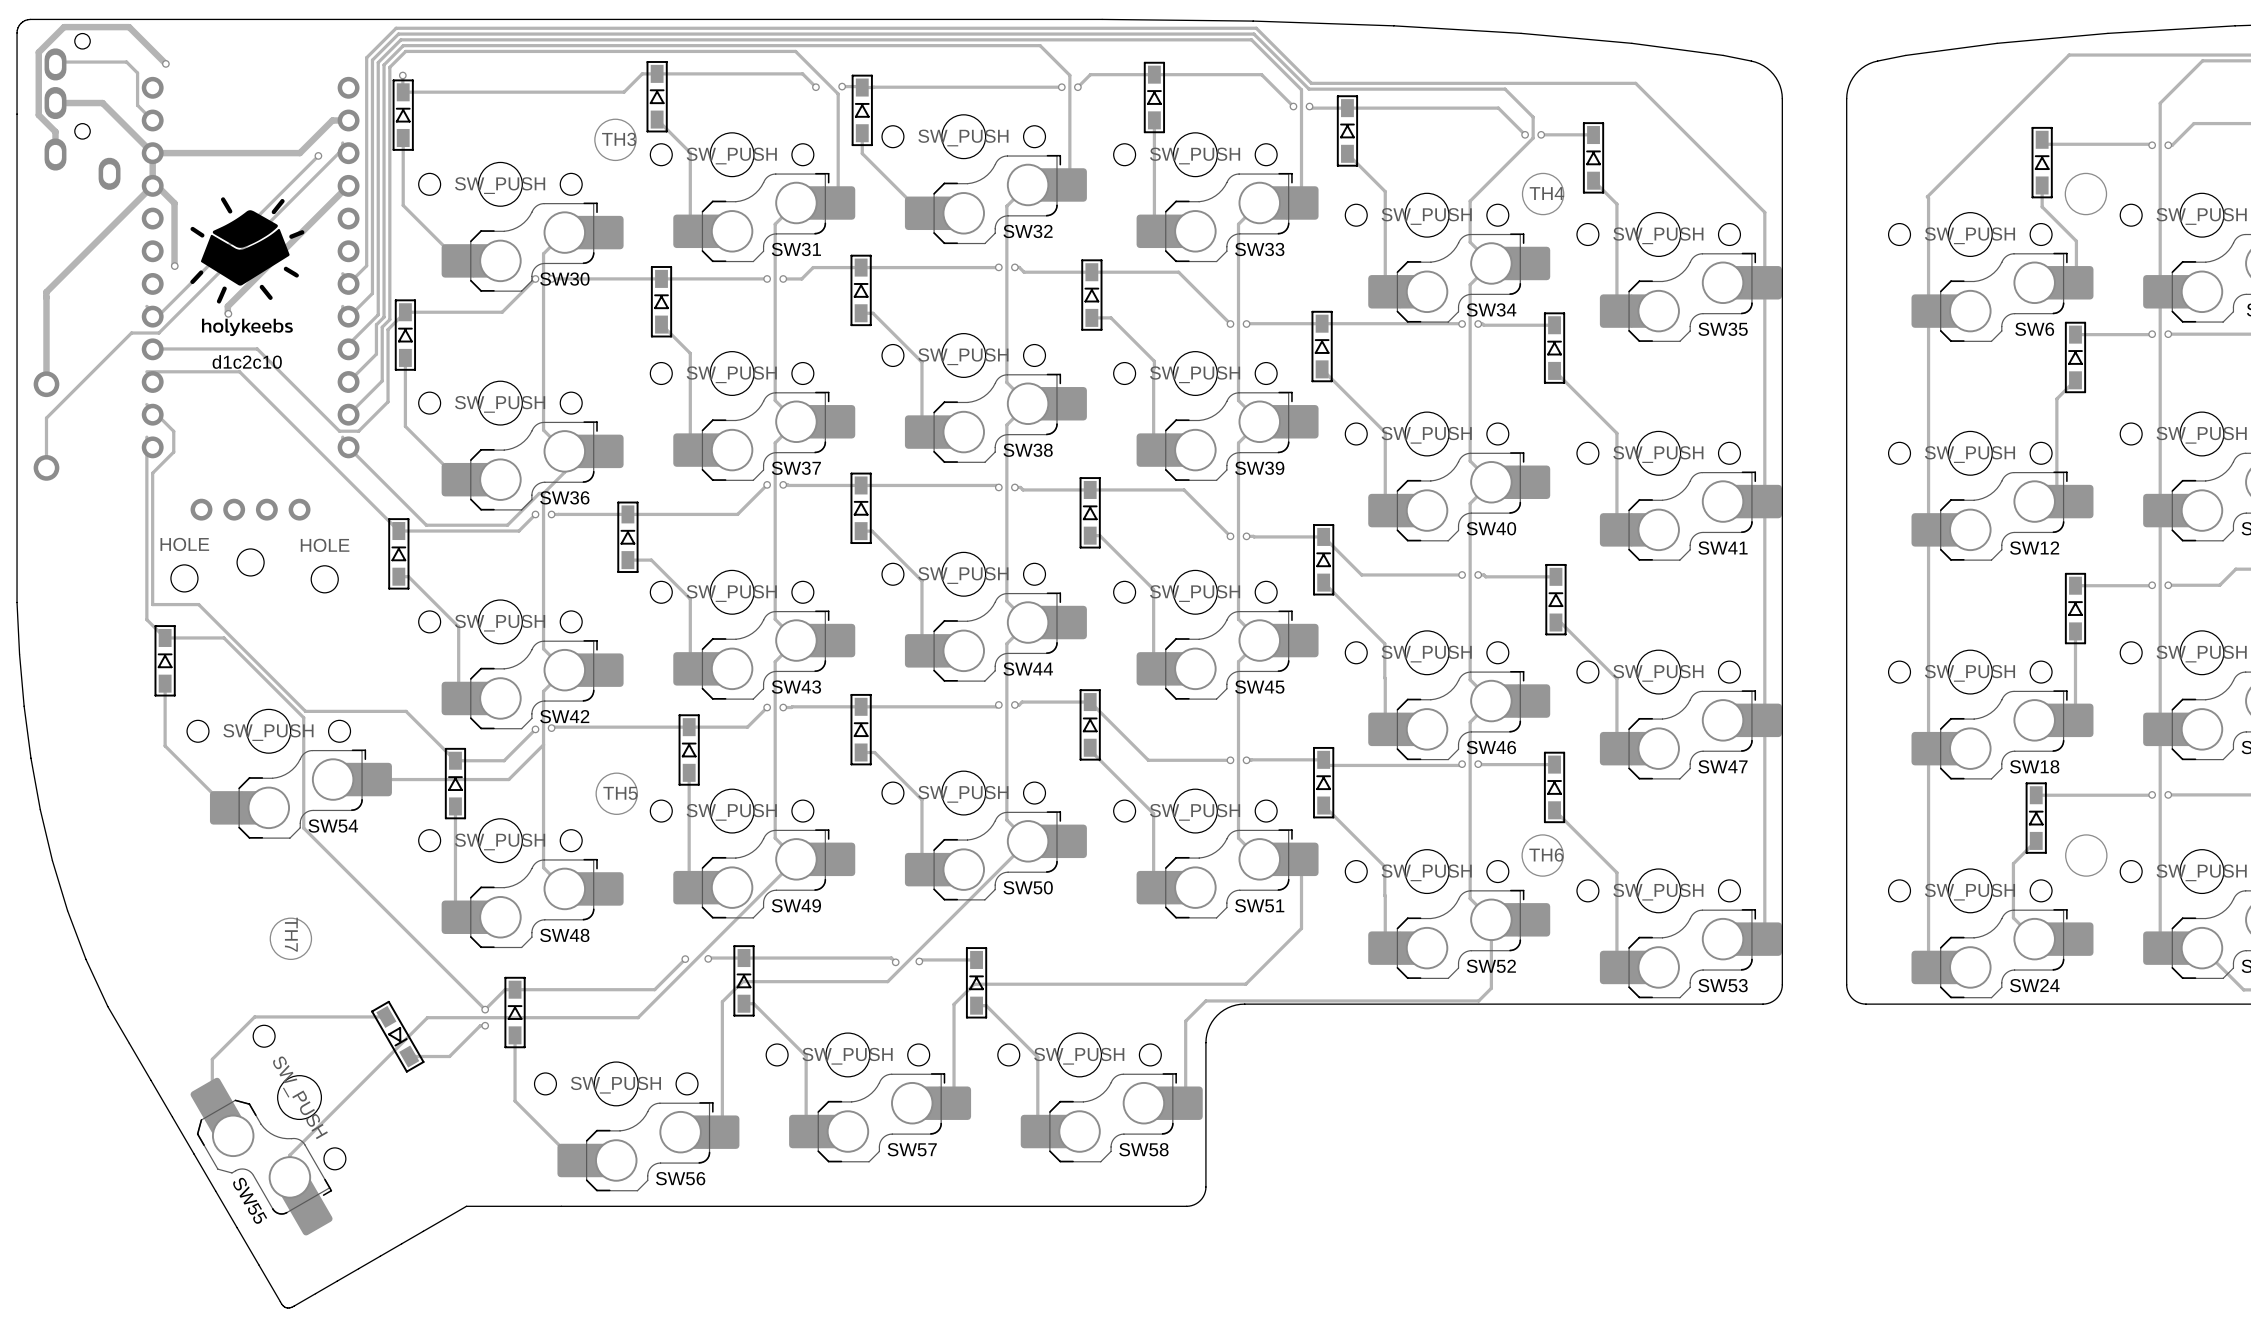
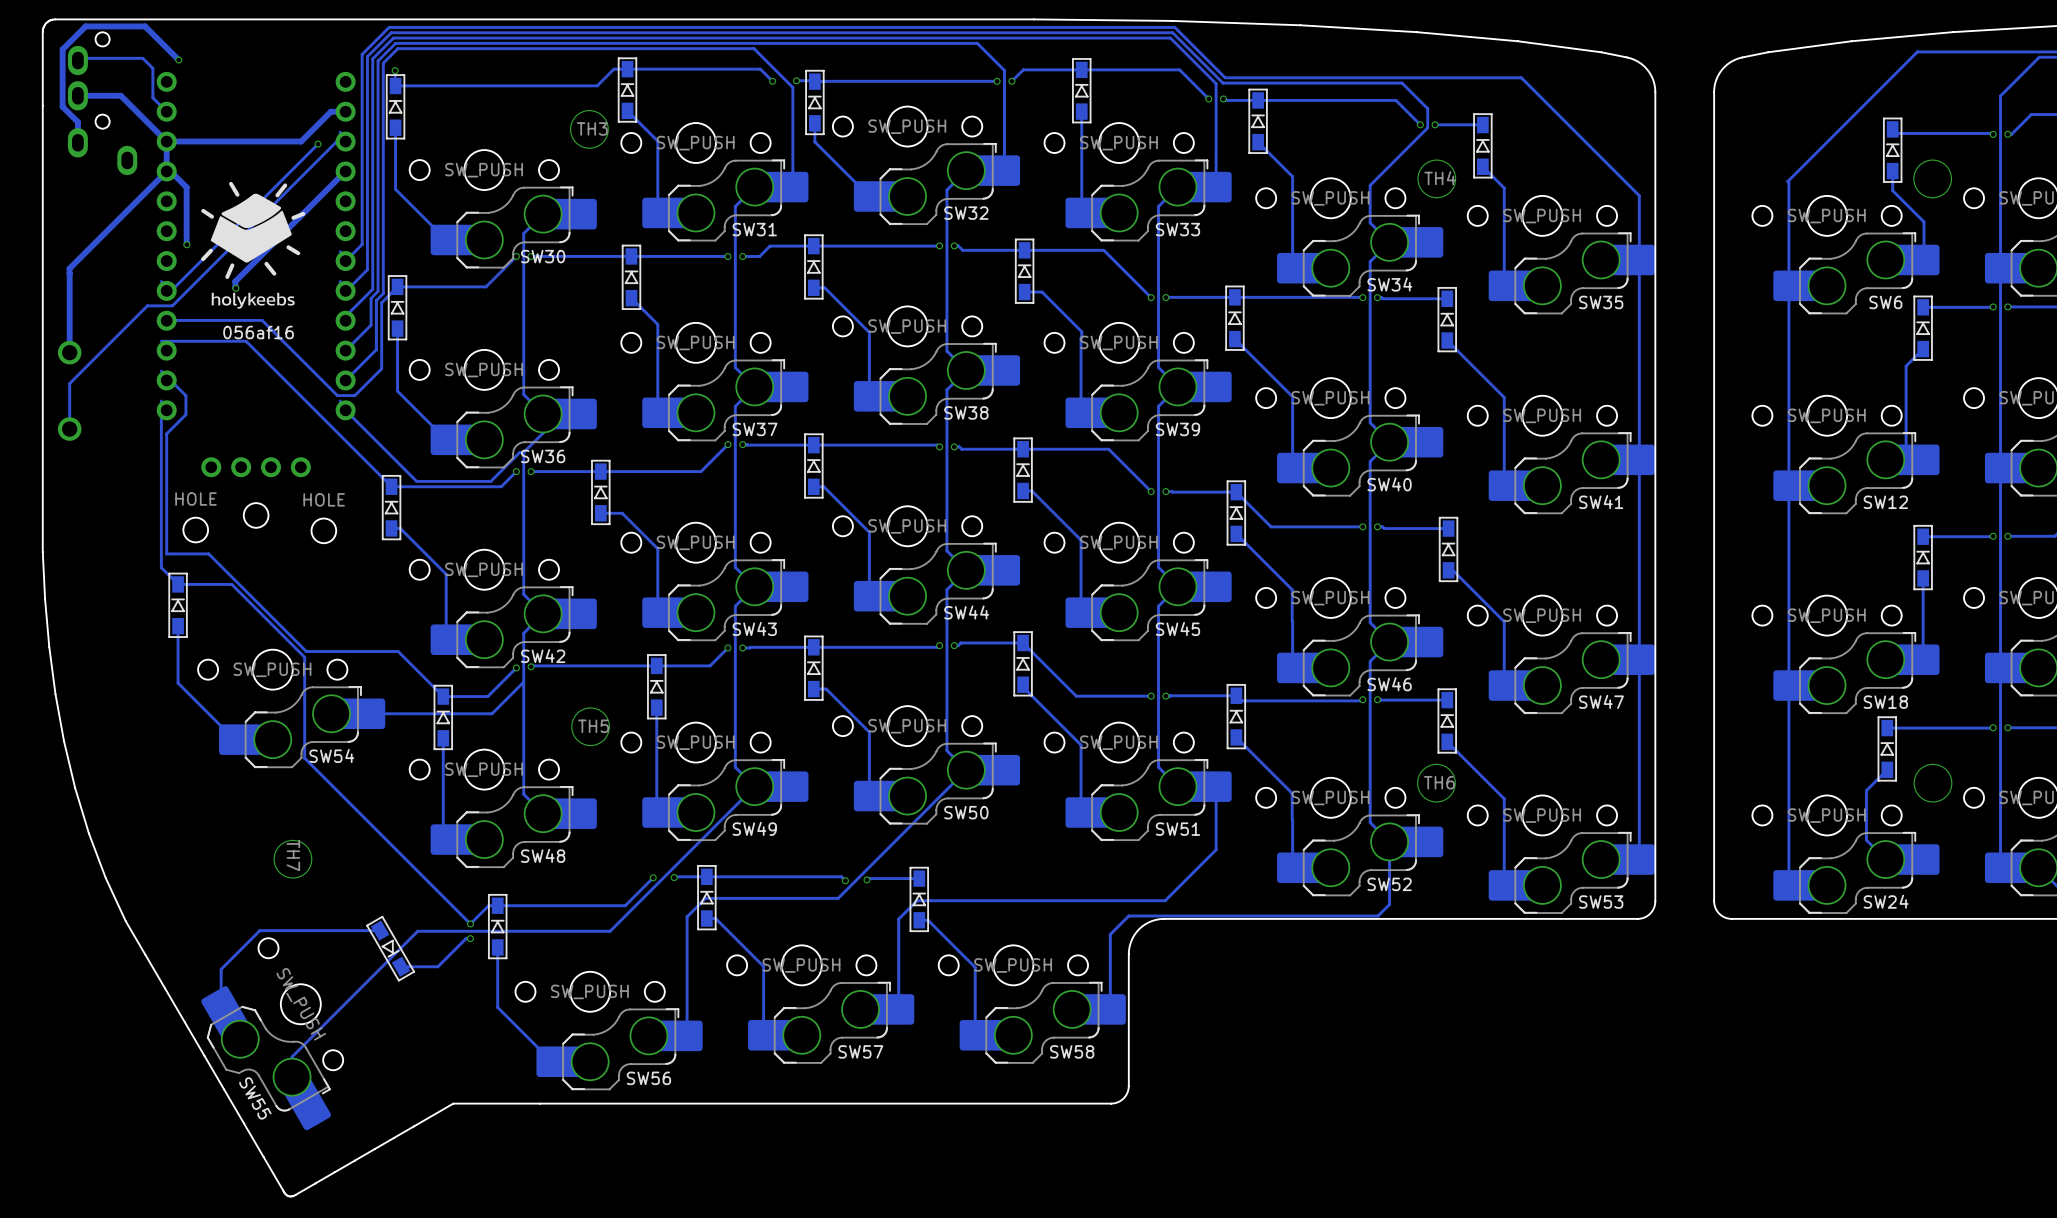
text: d1c2c10 (247, 361) -> 056af16 (258, 332)

